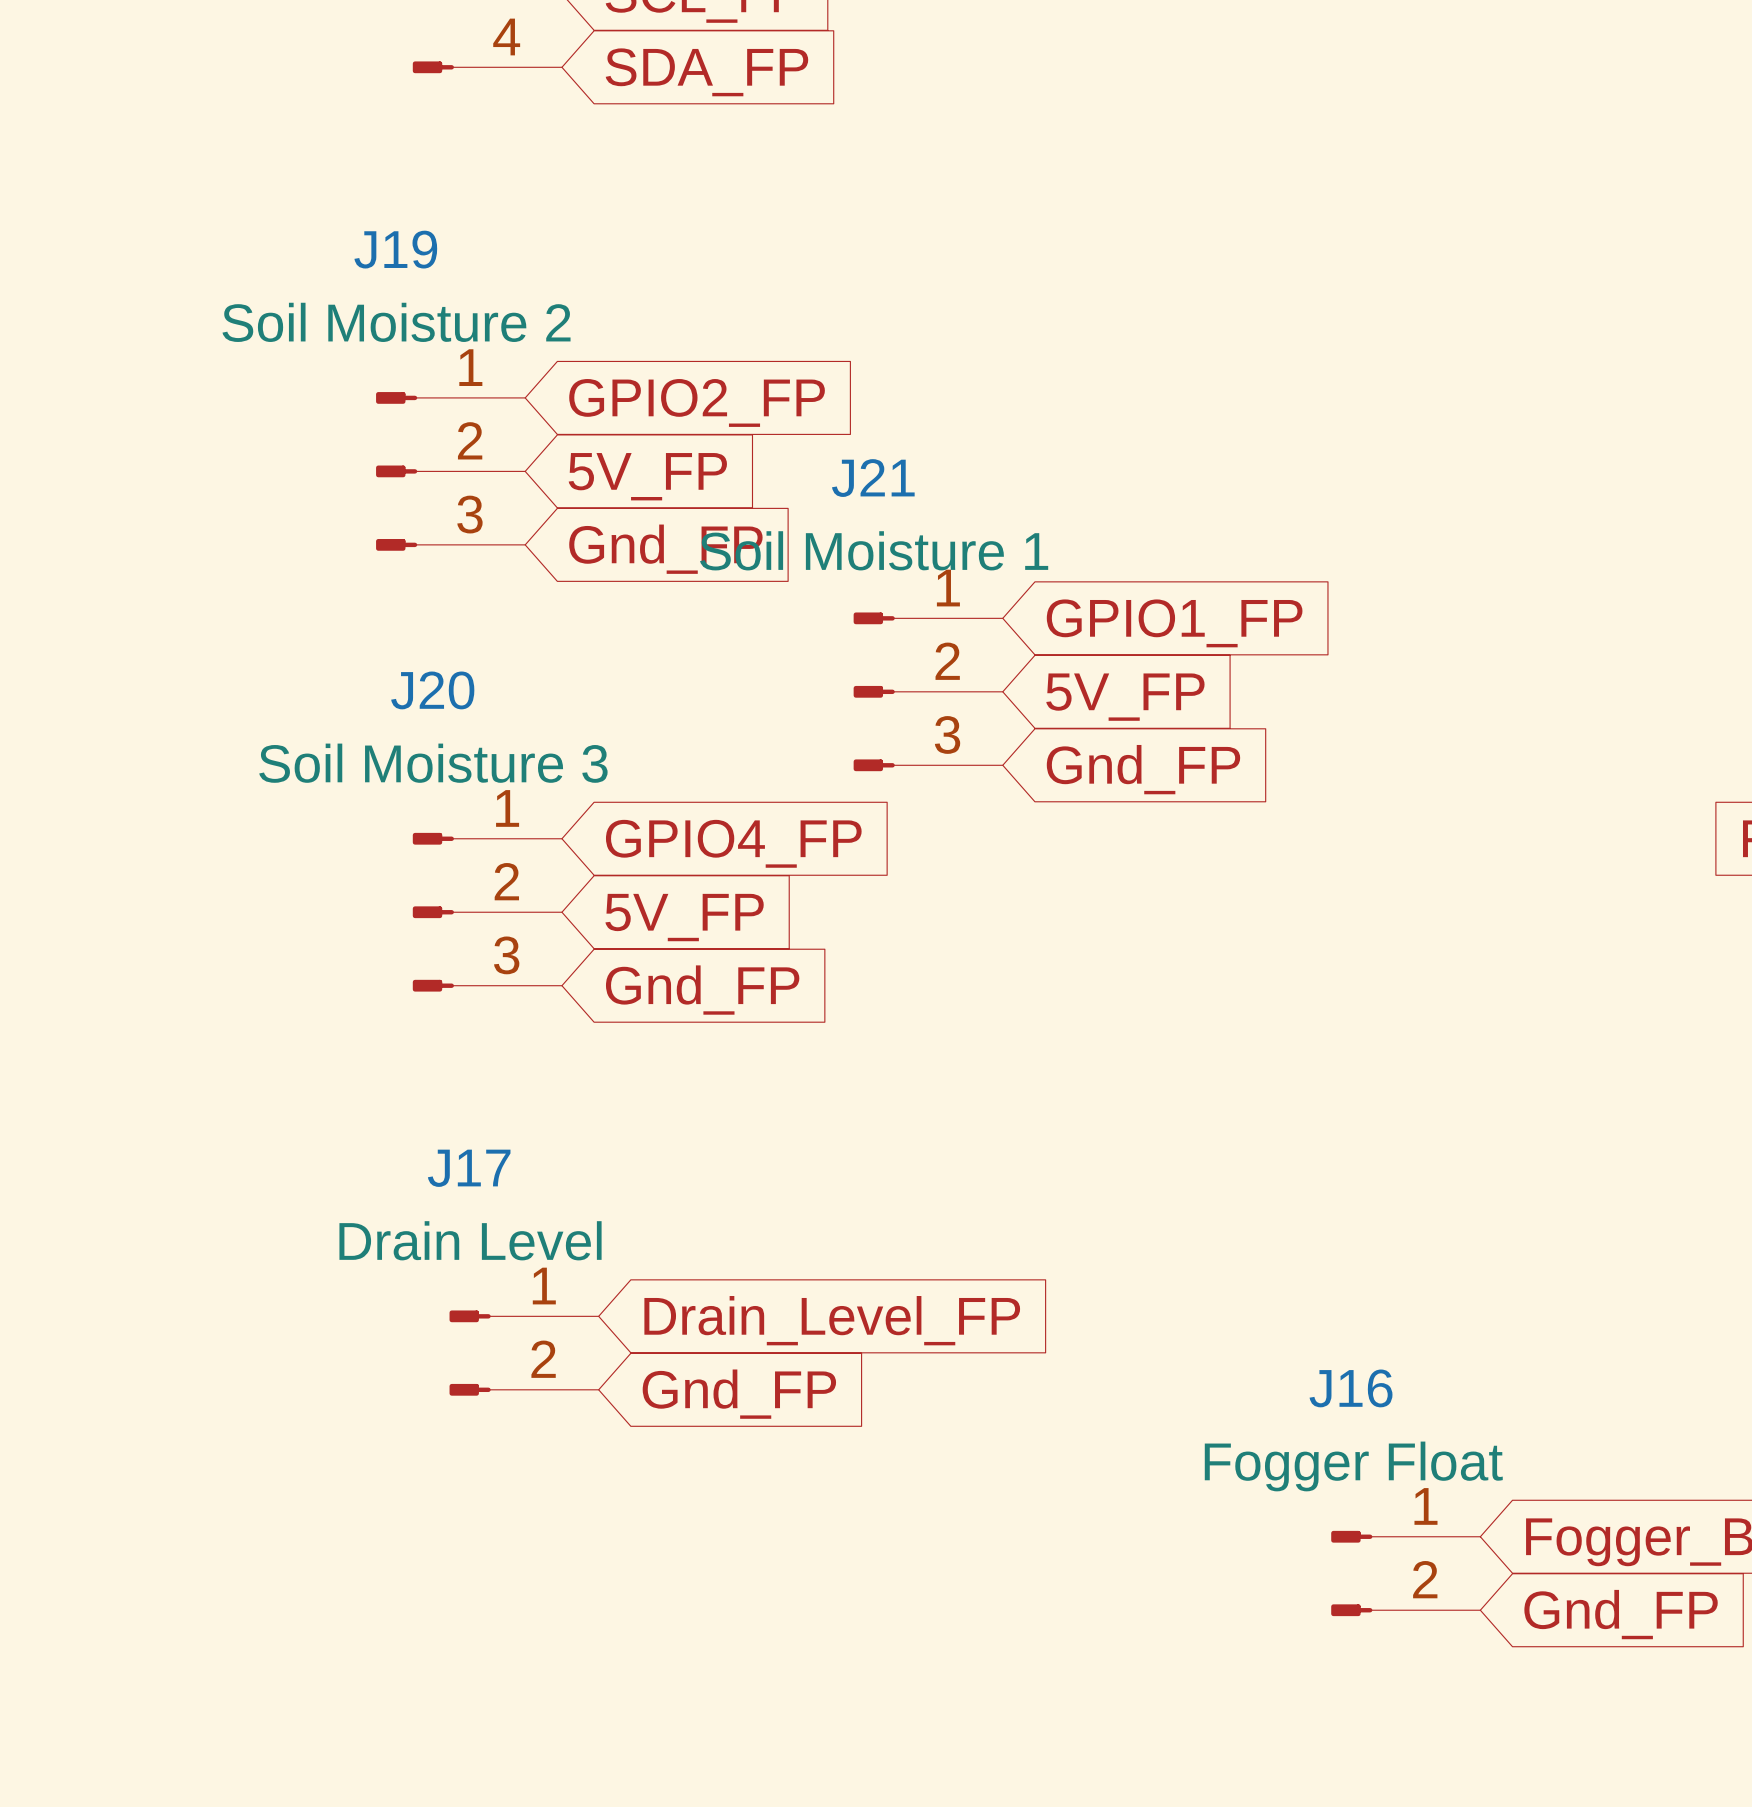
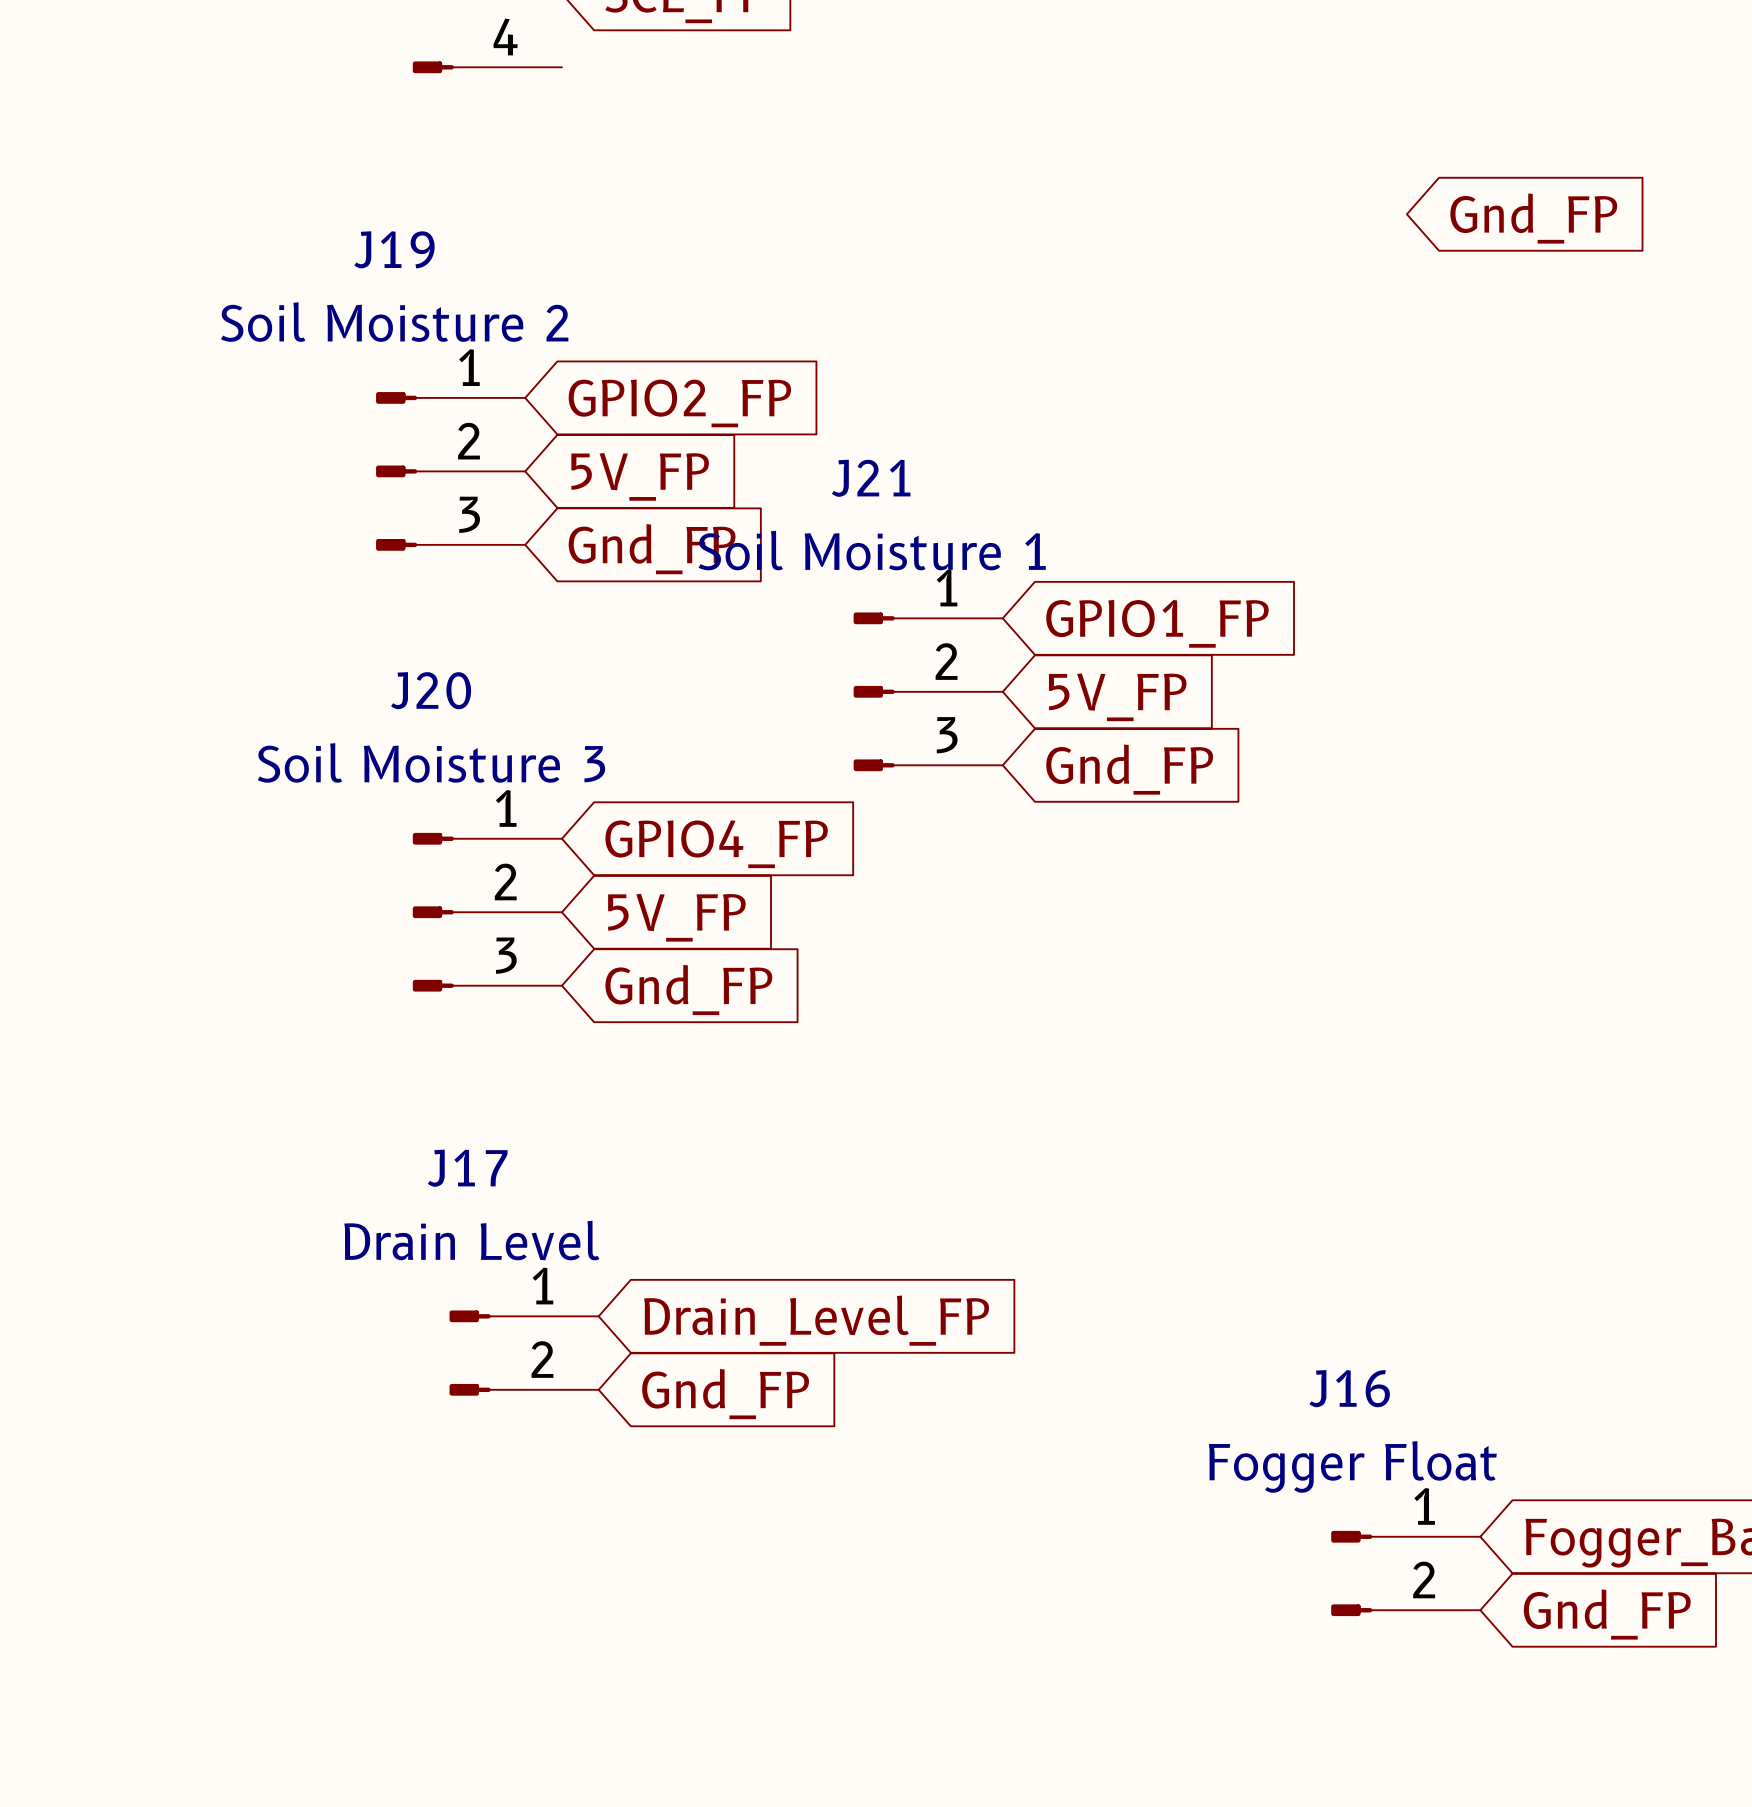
global label: SDA_FP (706, 72) -> none
global label: none -> Gnd_FP (1533, 218)

